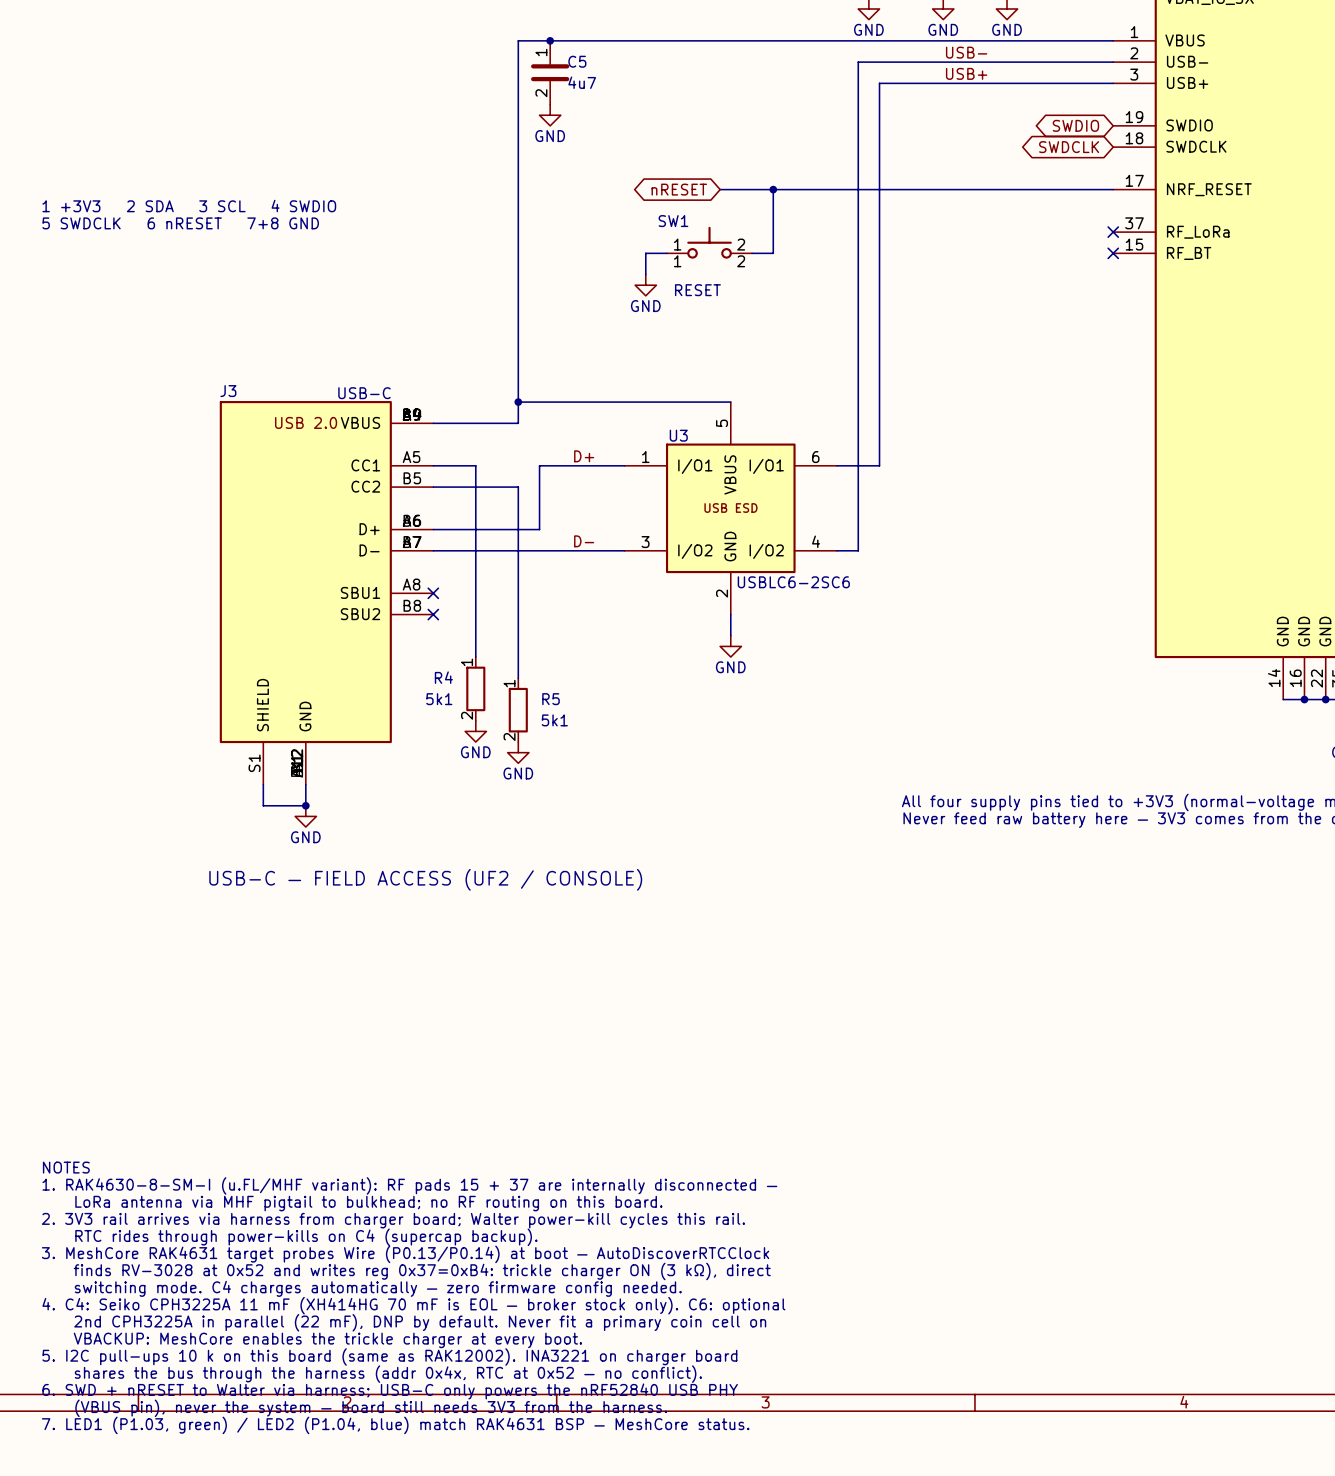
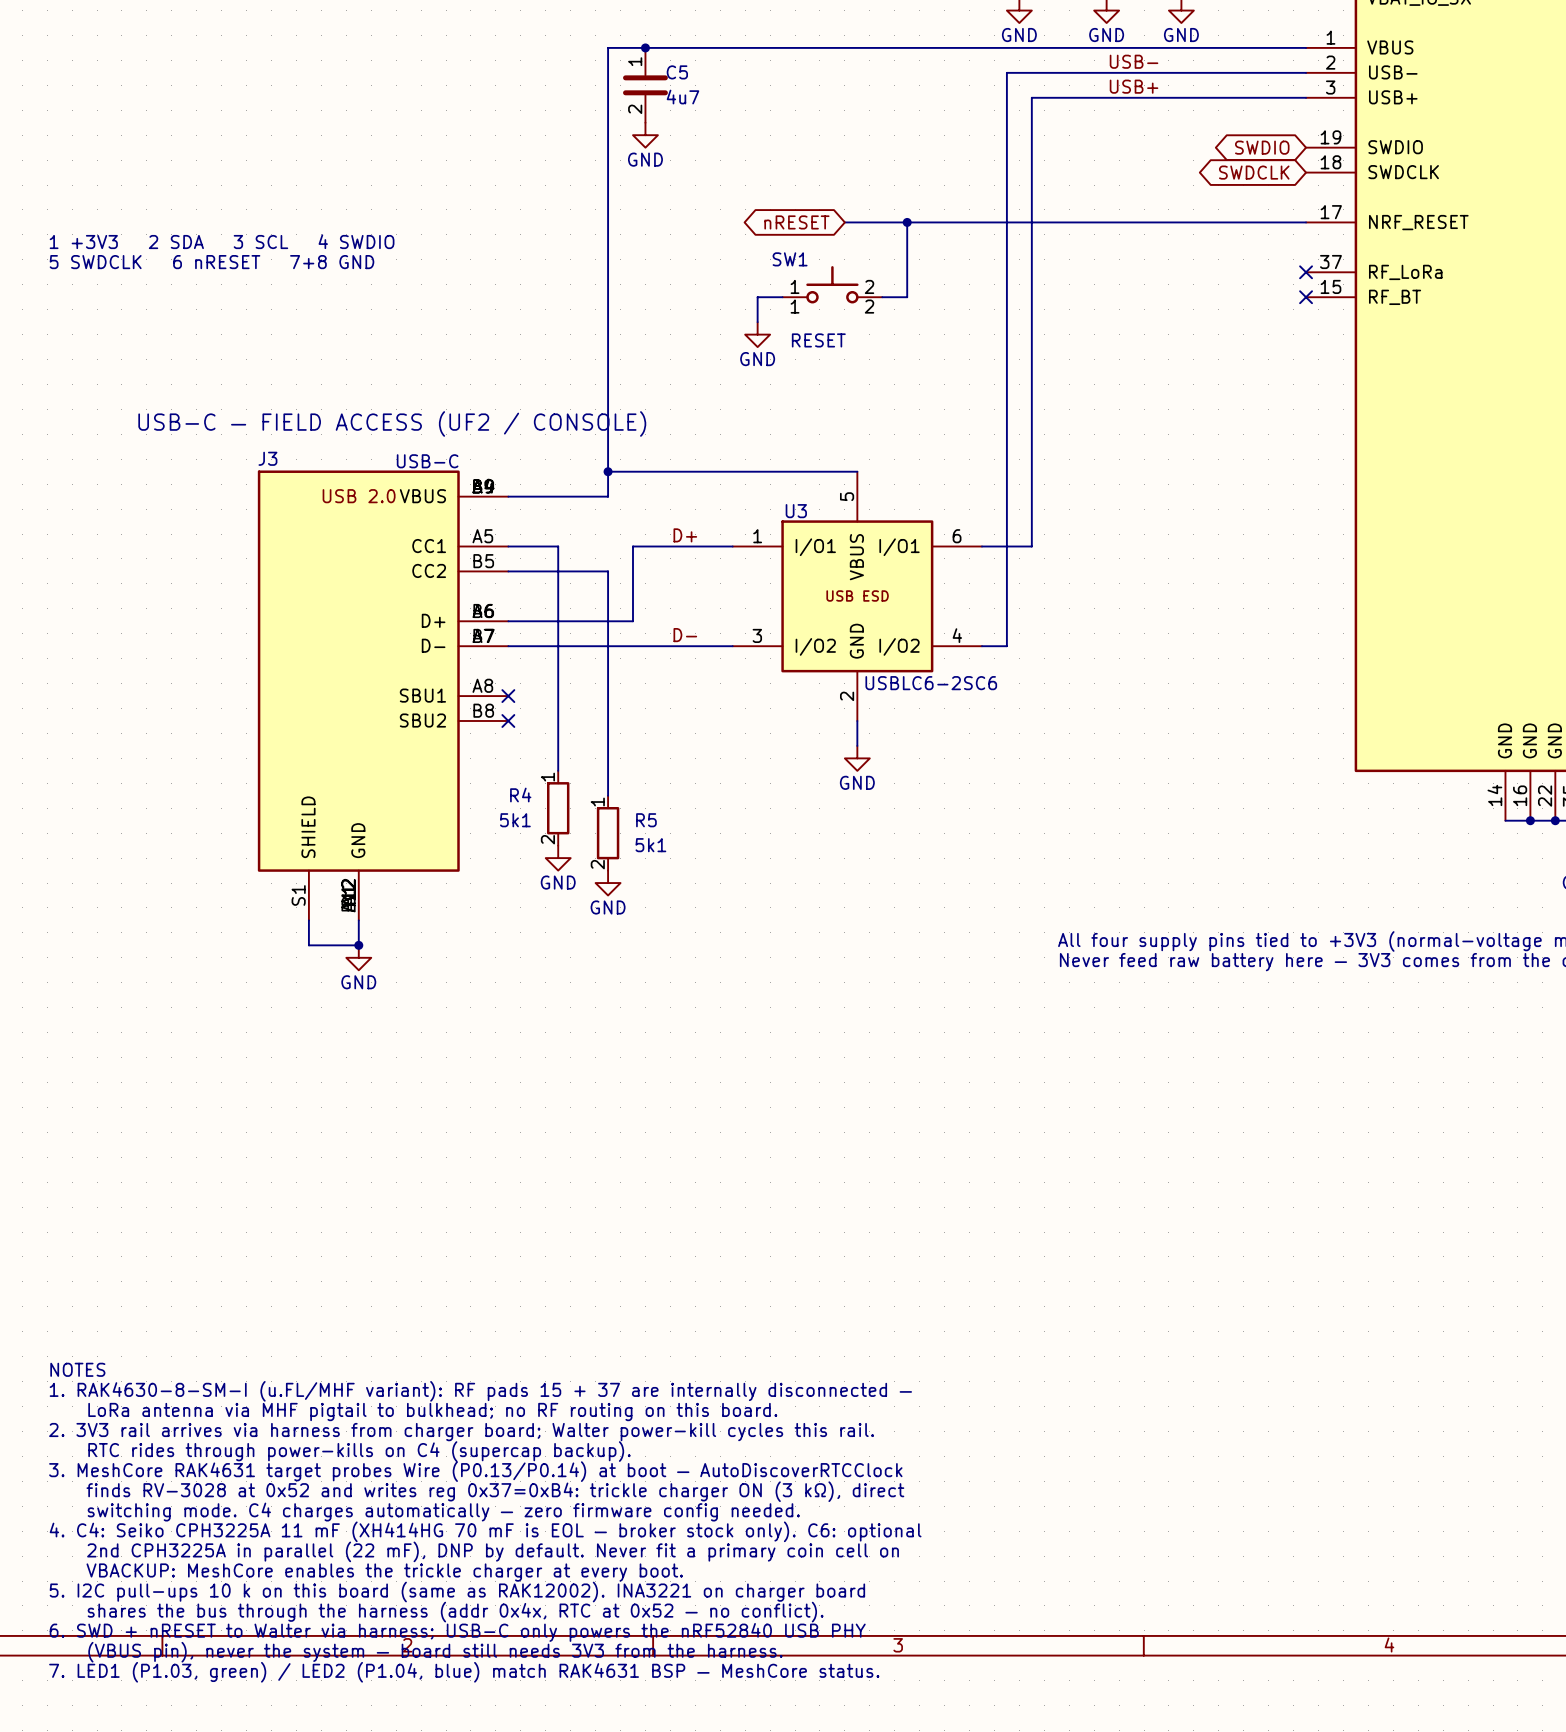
text: none -> USB-C — FIELD ACCESS (UF2 / CONSOLE) (392, 423)
text: USB-C — FIELD ACCESS (UF2 / CONSOLE) (425, 879) -> none

